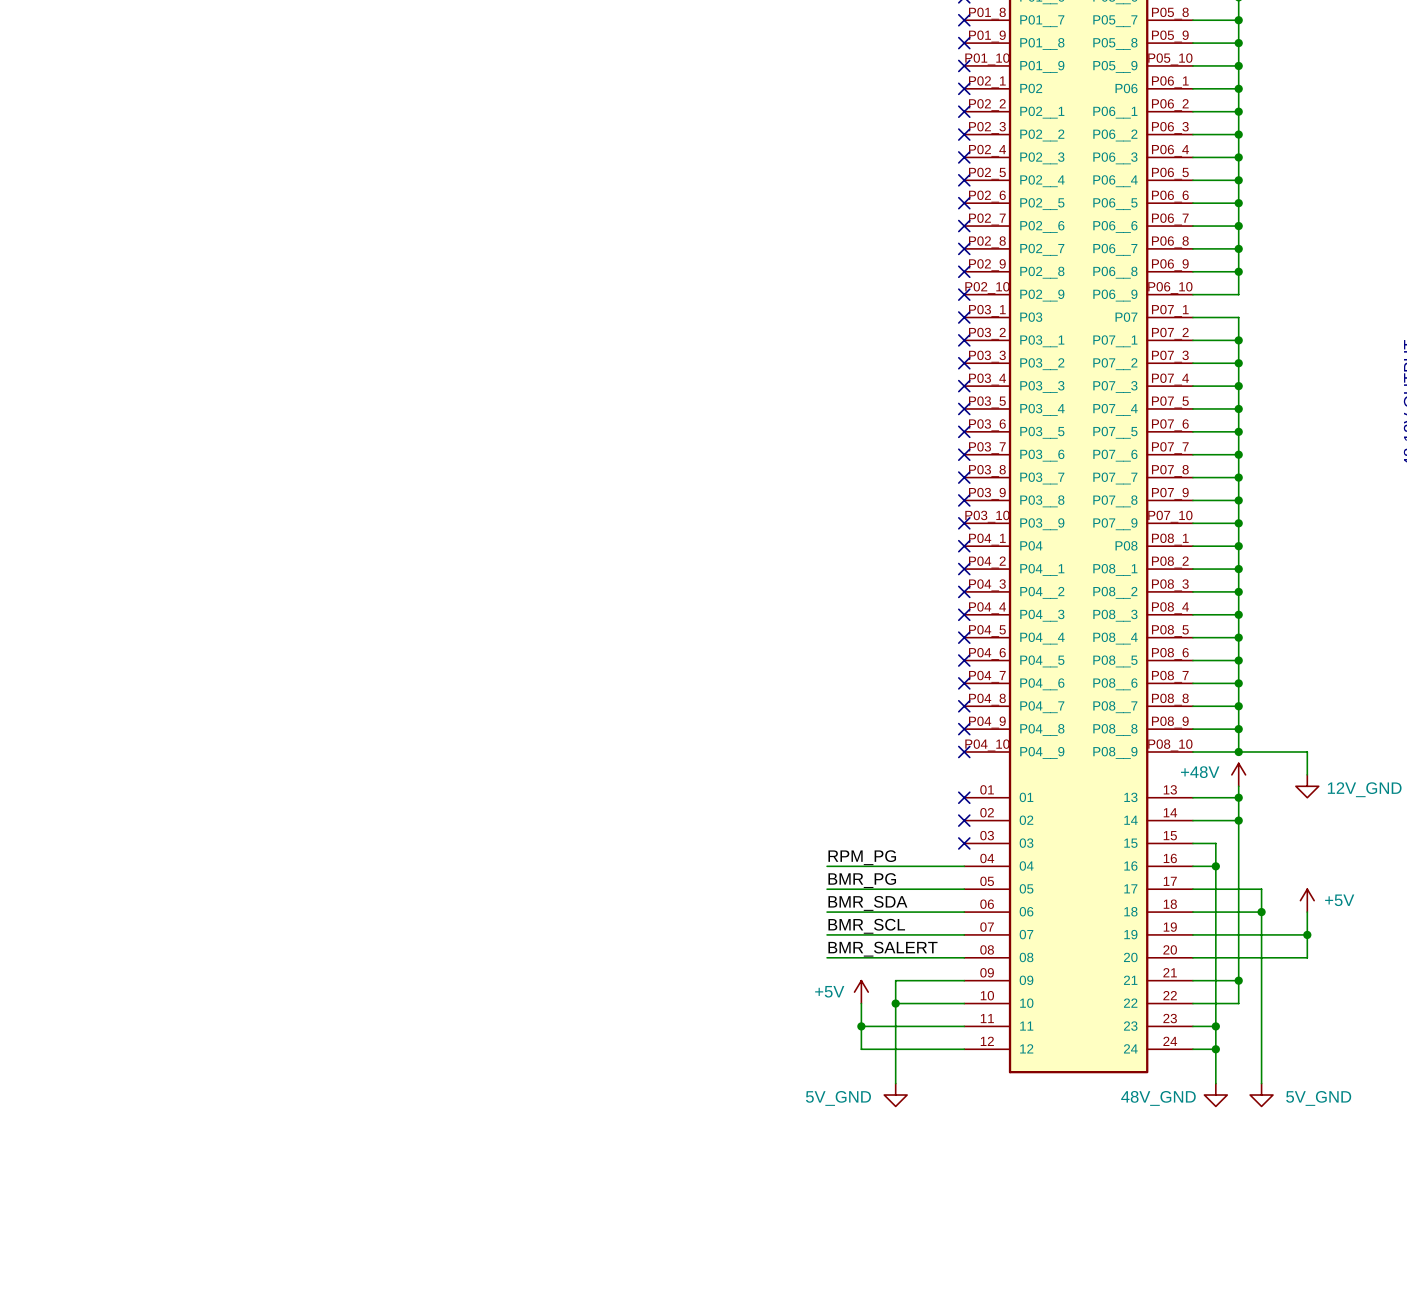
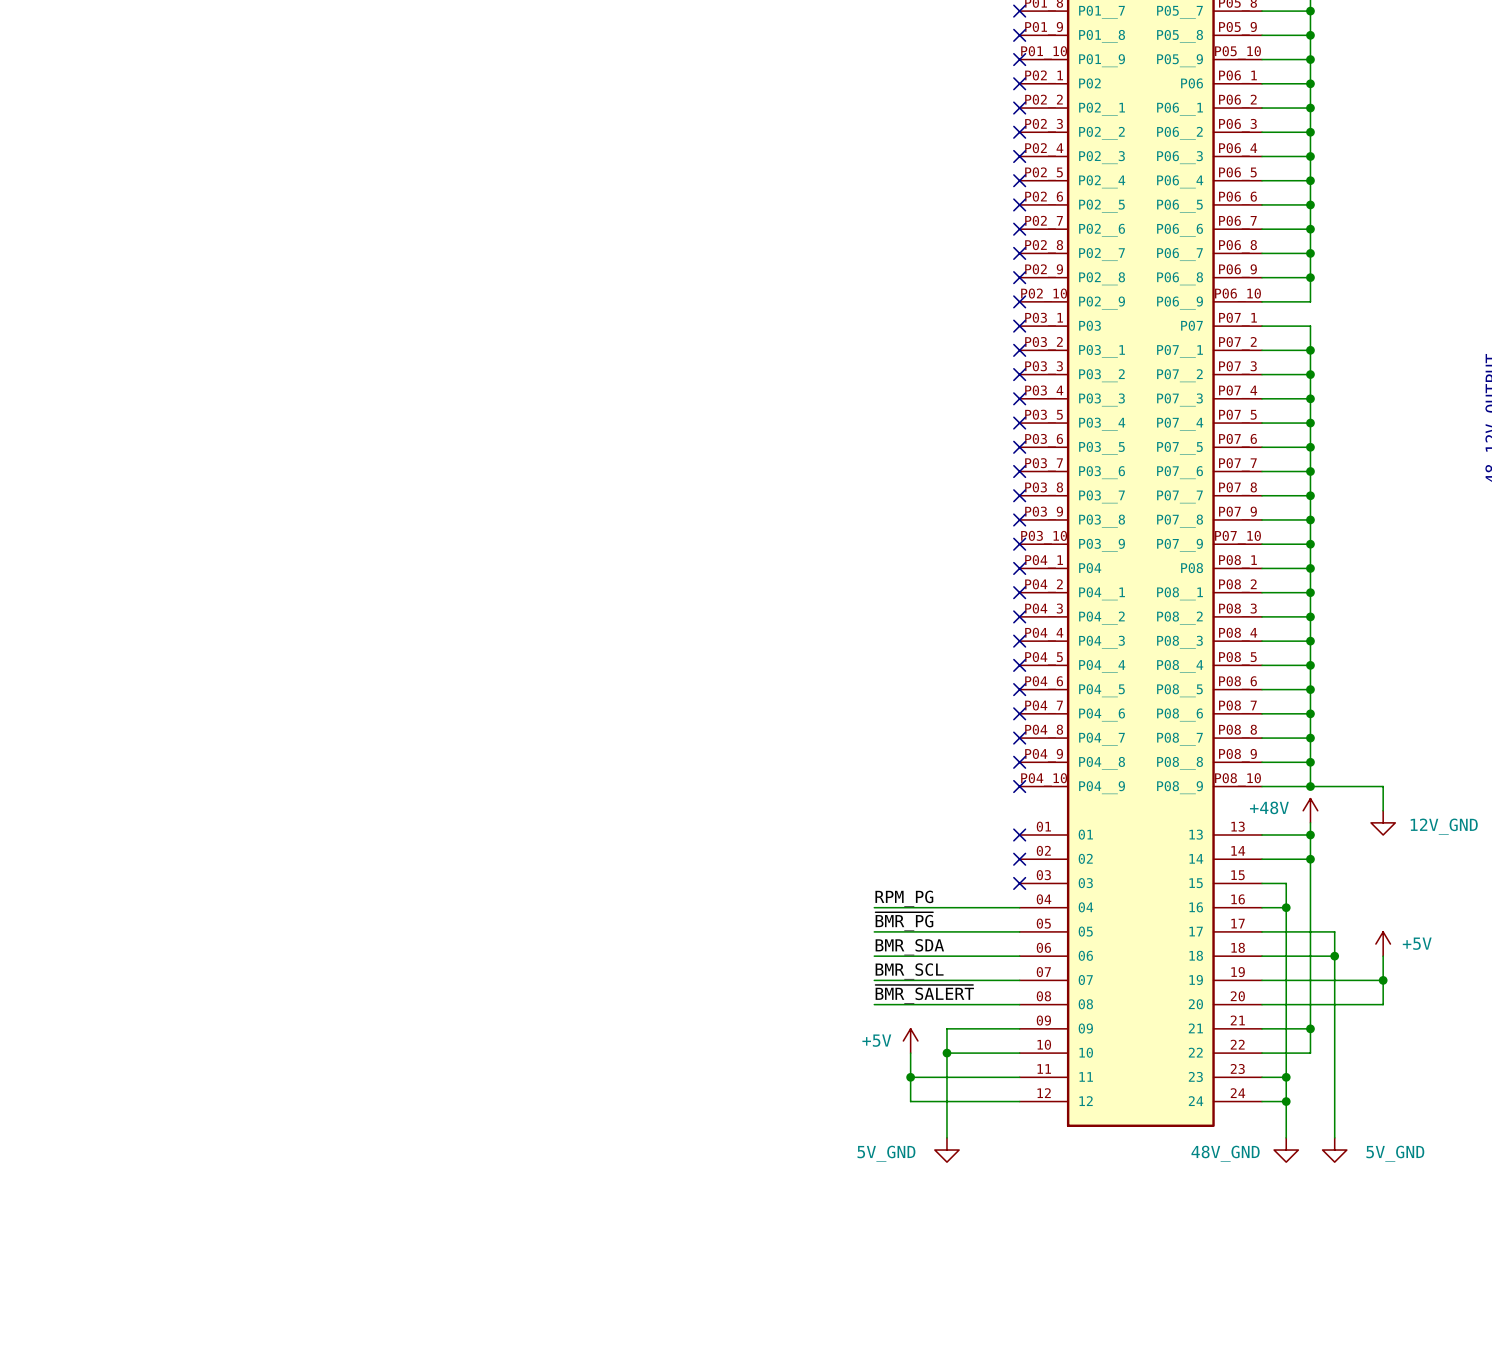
label: BMR_PG (862, 880) -> ~{BMR_PG} (904, 921)
label: BMR_SALERT (882, 949) -> ~{BMR_SALERT} (924, 994)

